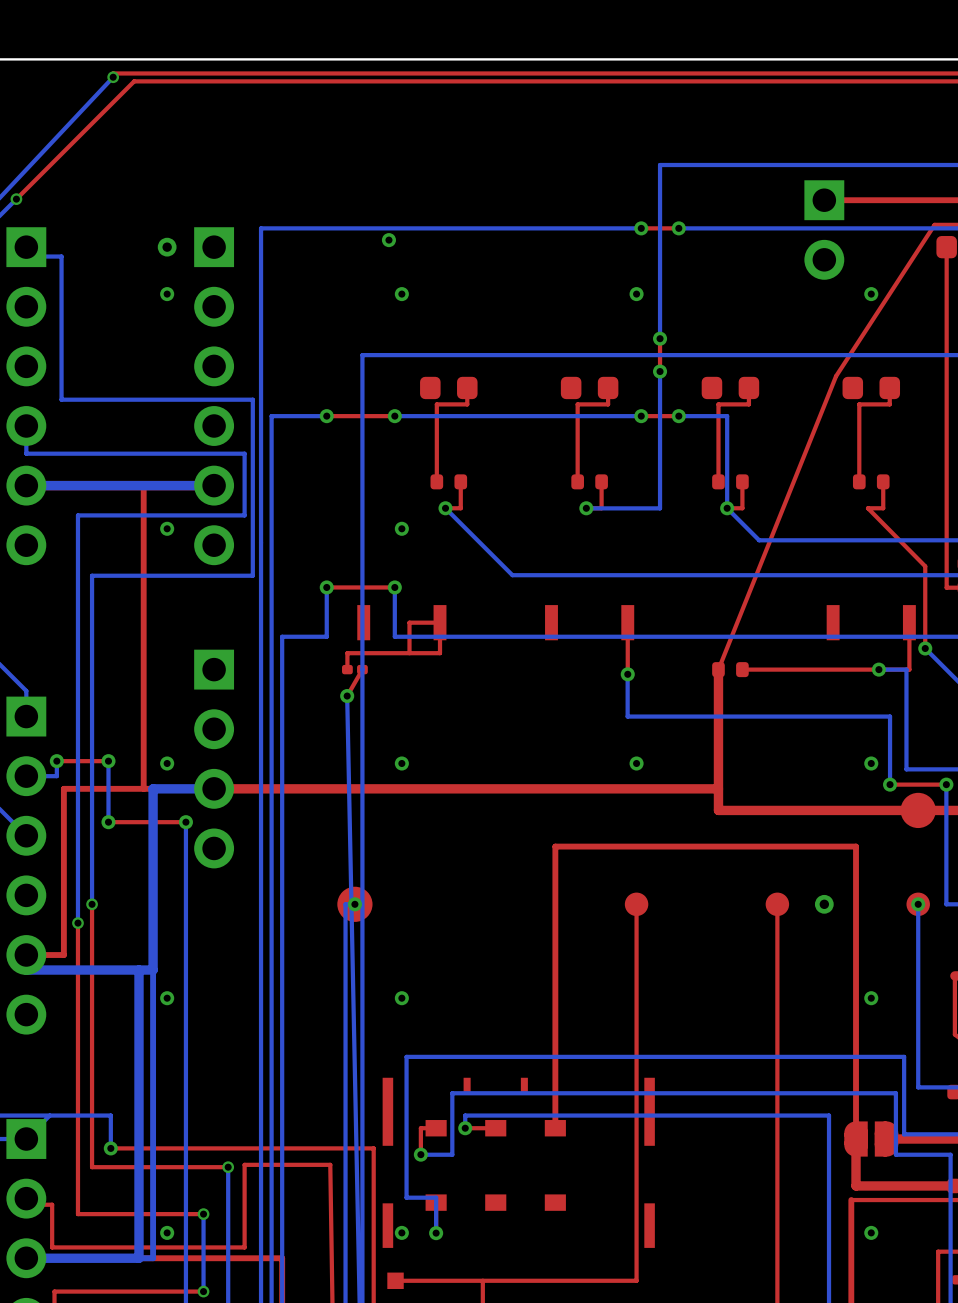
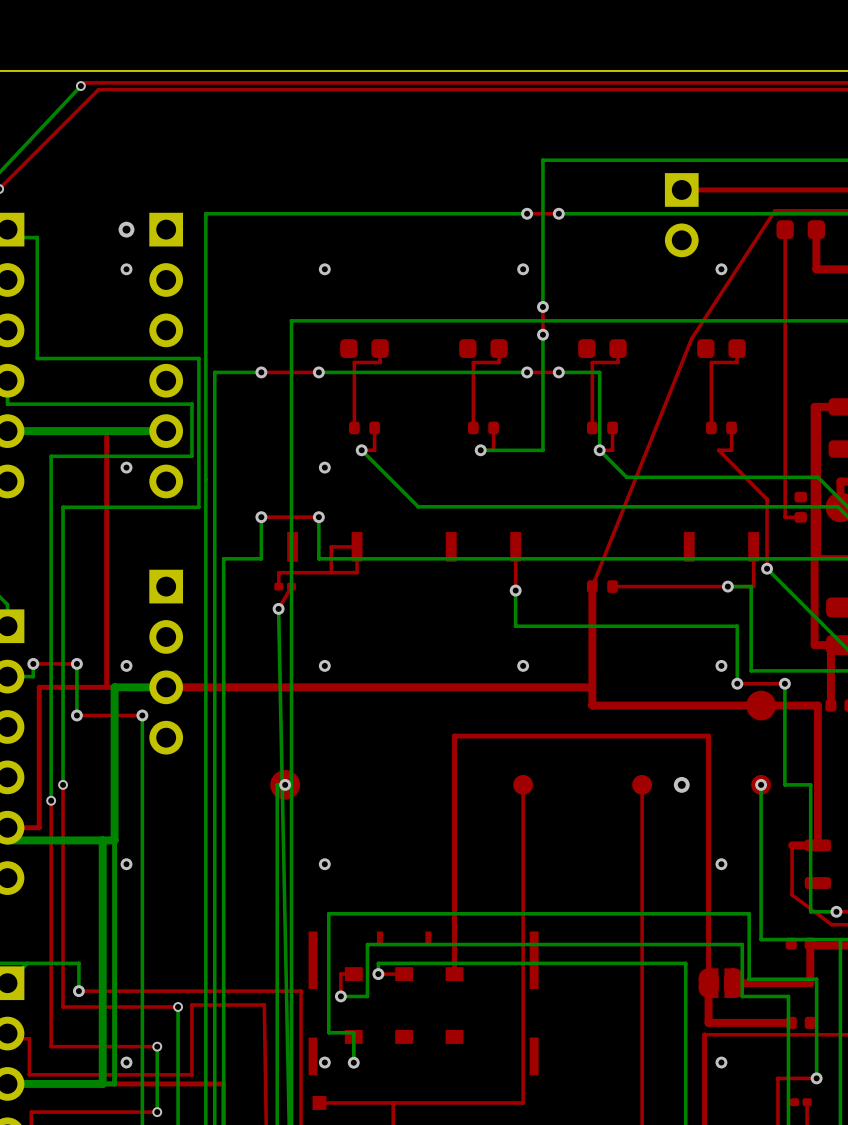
via: (388, 240) -> none

